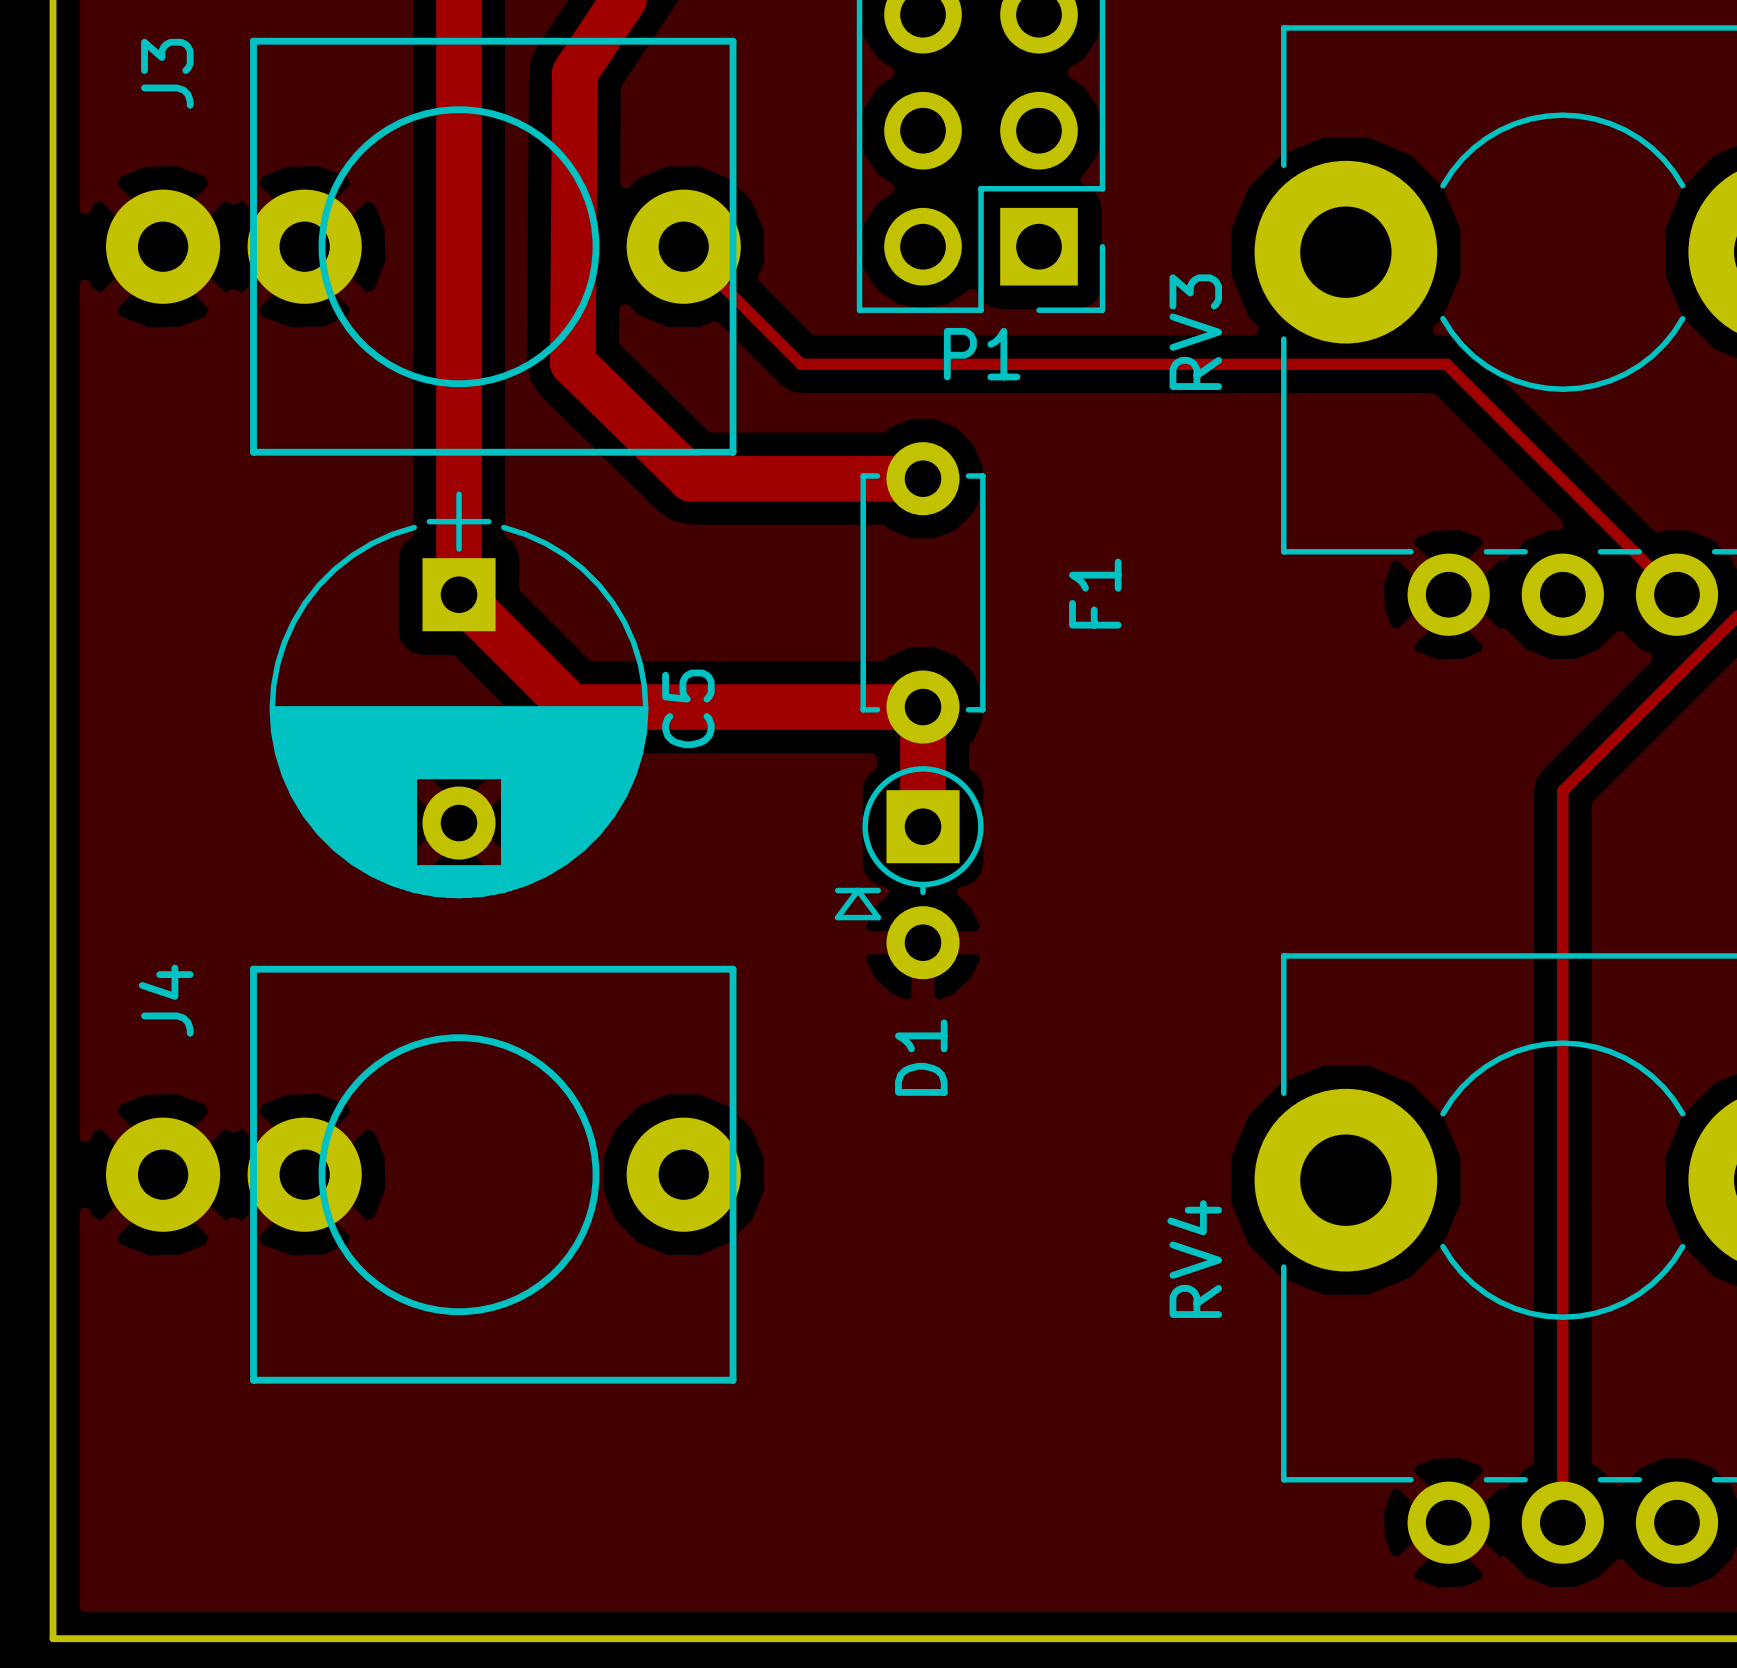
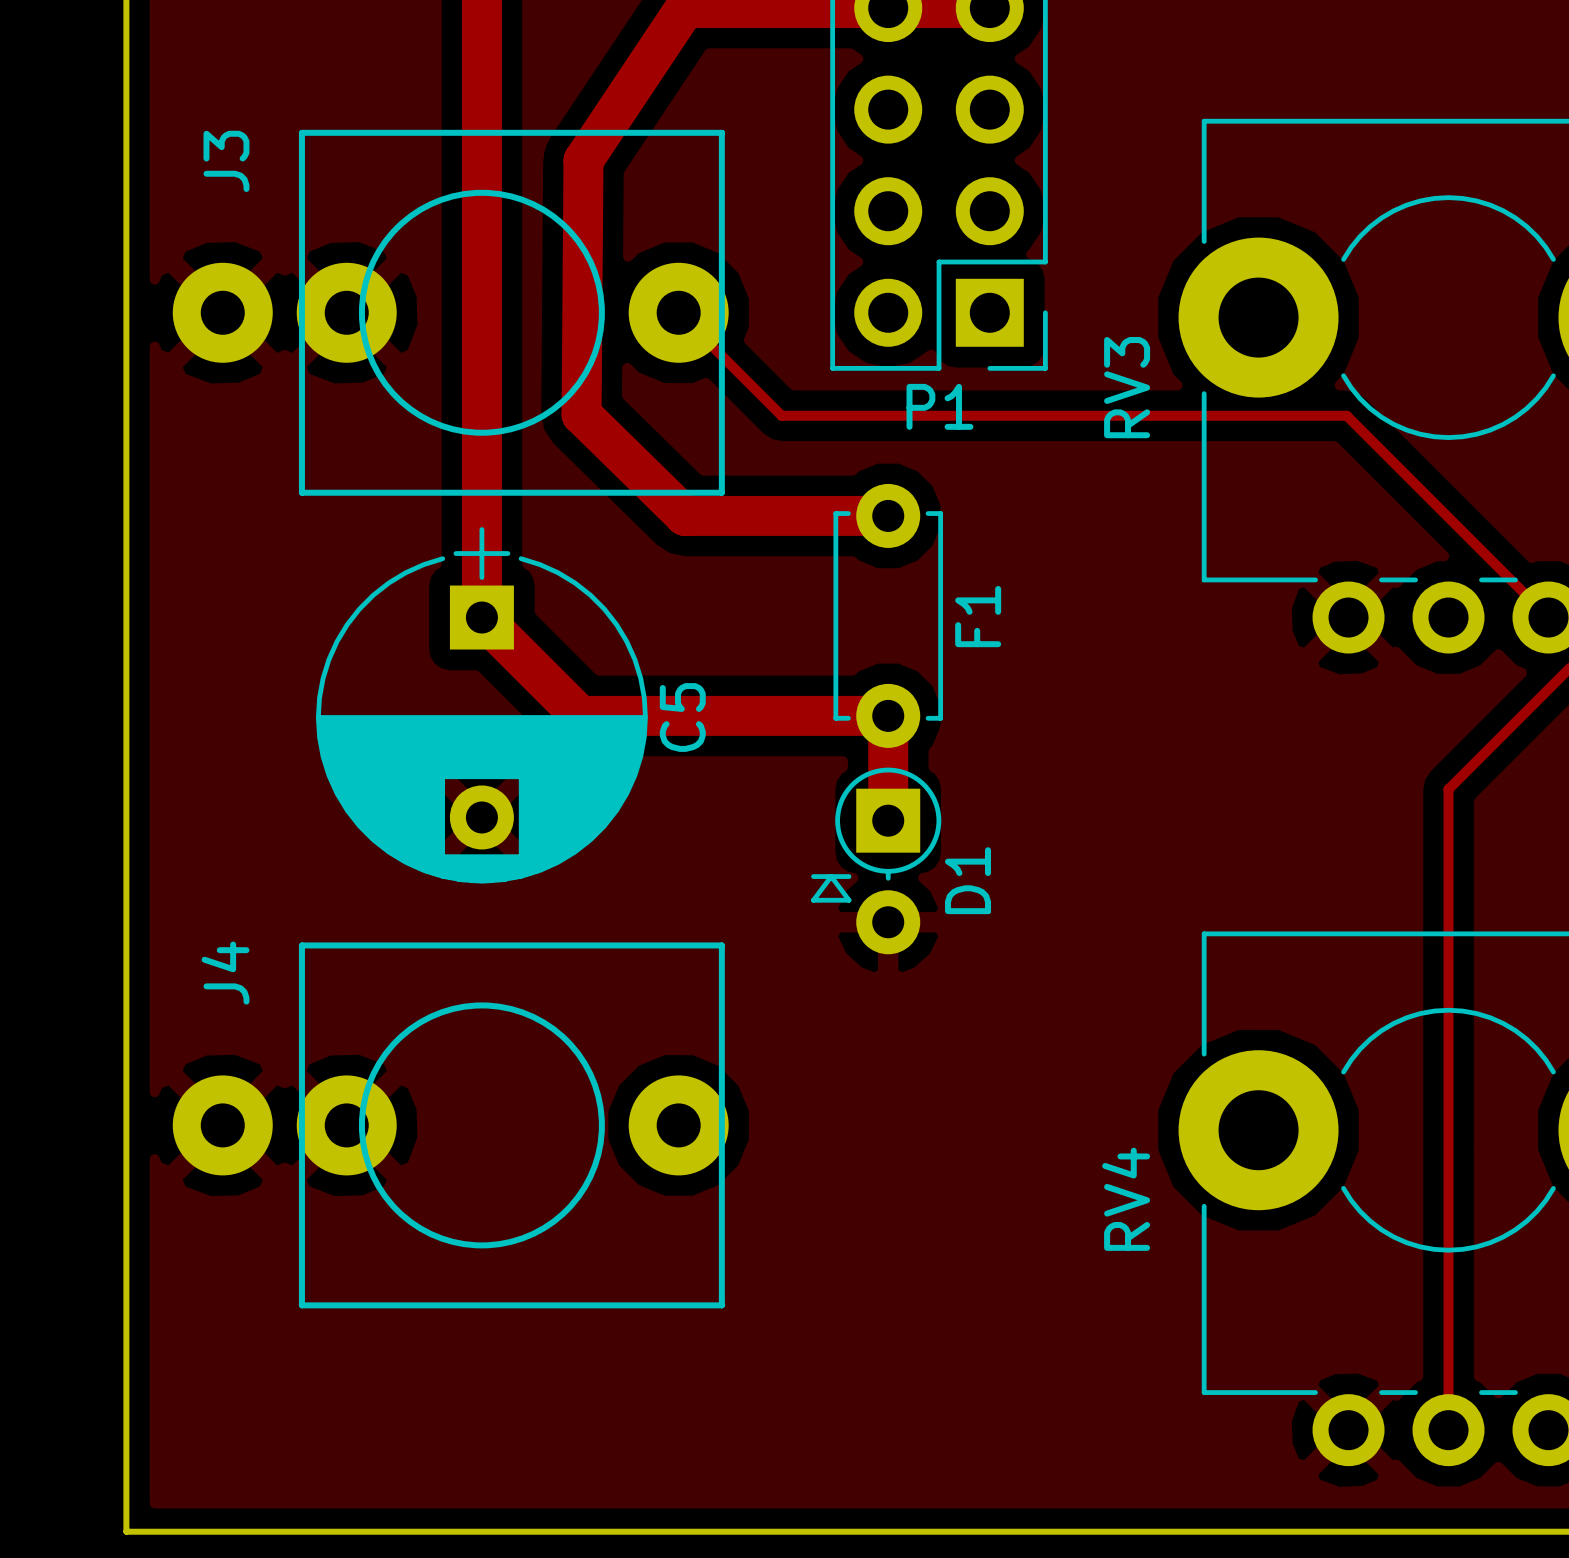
F1 name position: F1 (1095, 593) -> F1 (978, 616)
D1 name position: D1 (921, 1057) -> D1 (968, 880)

